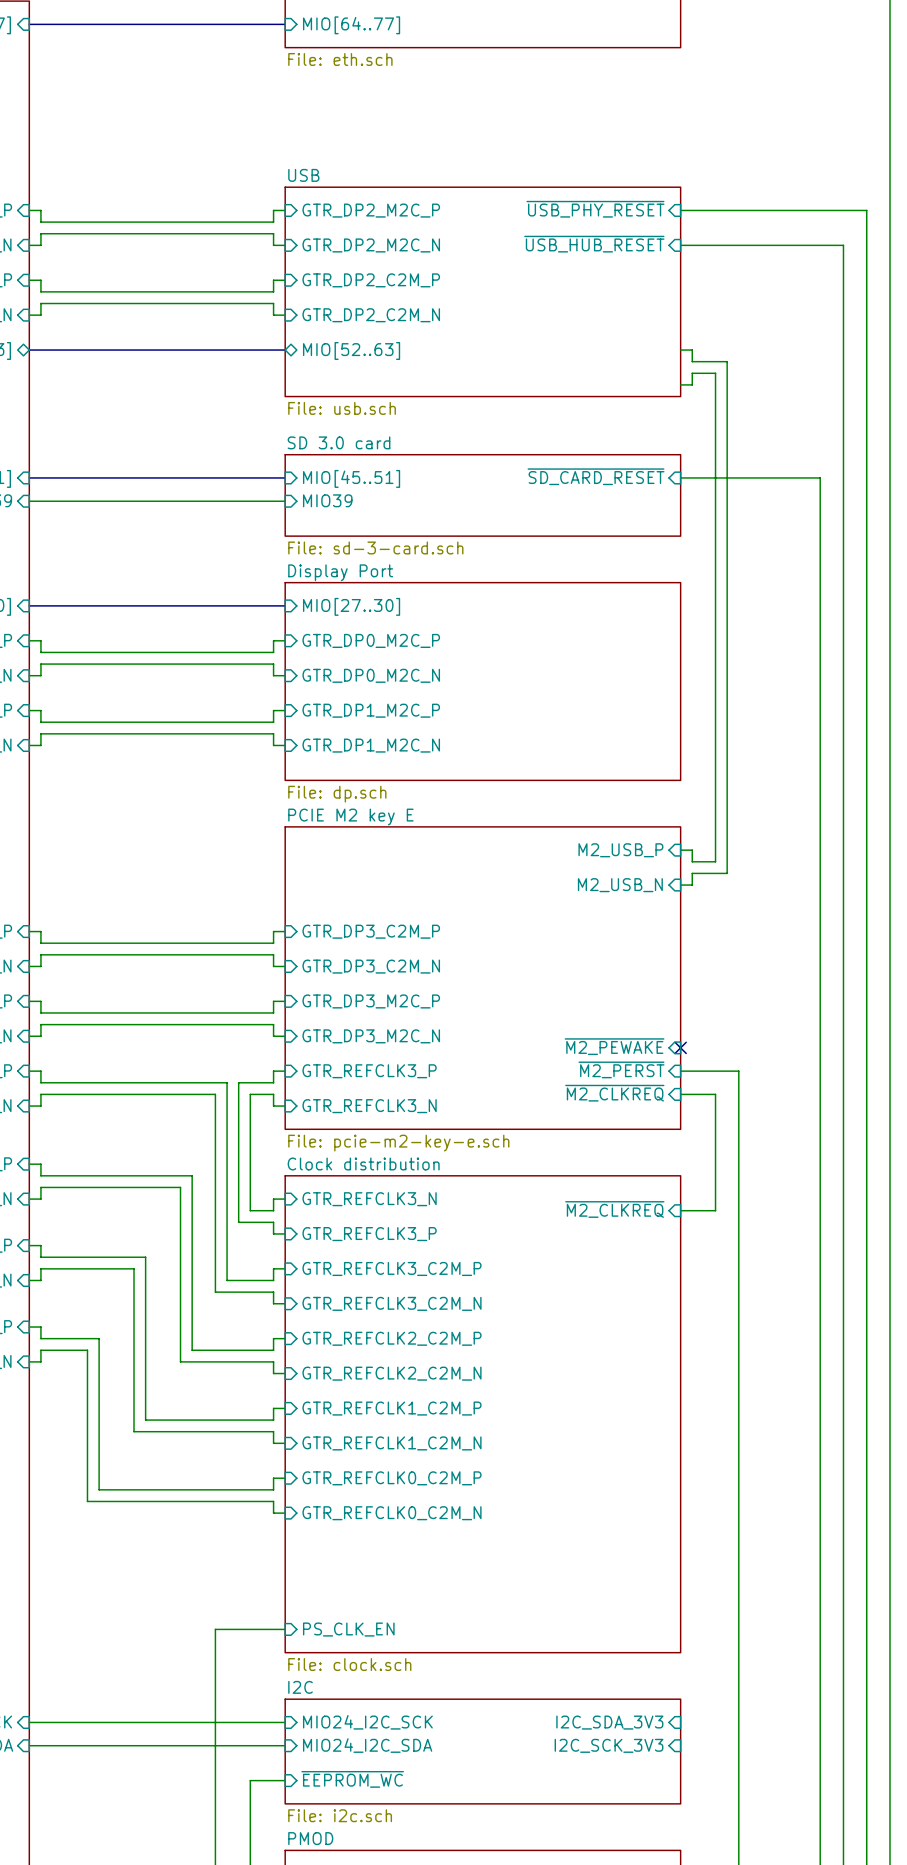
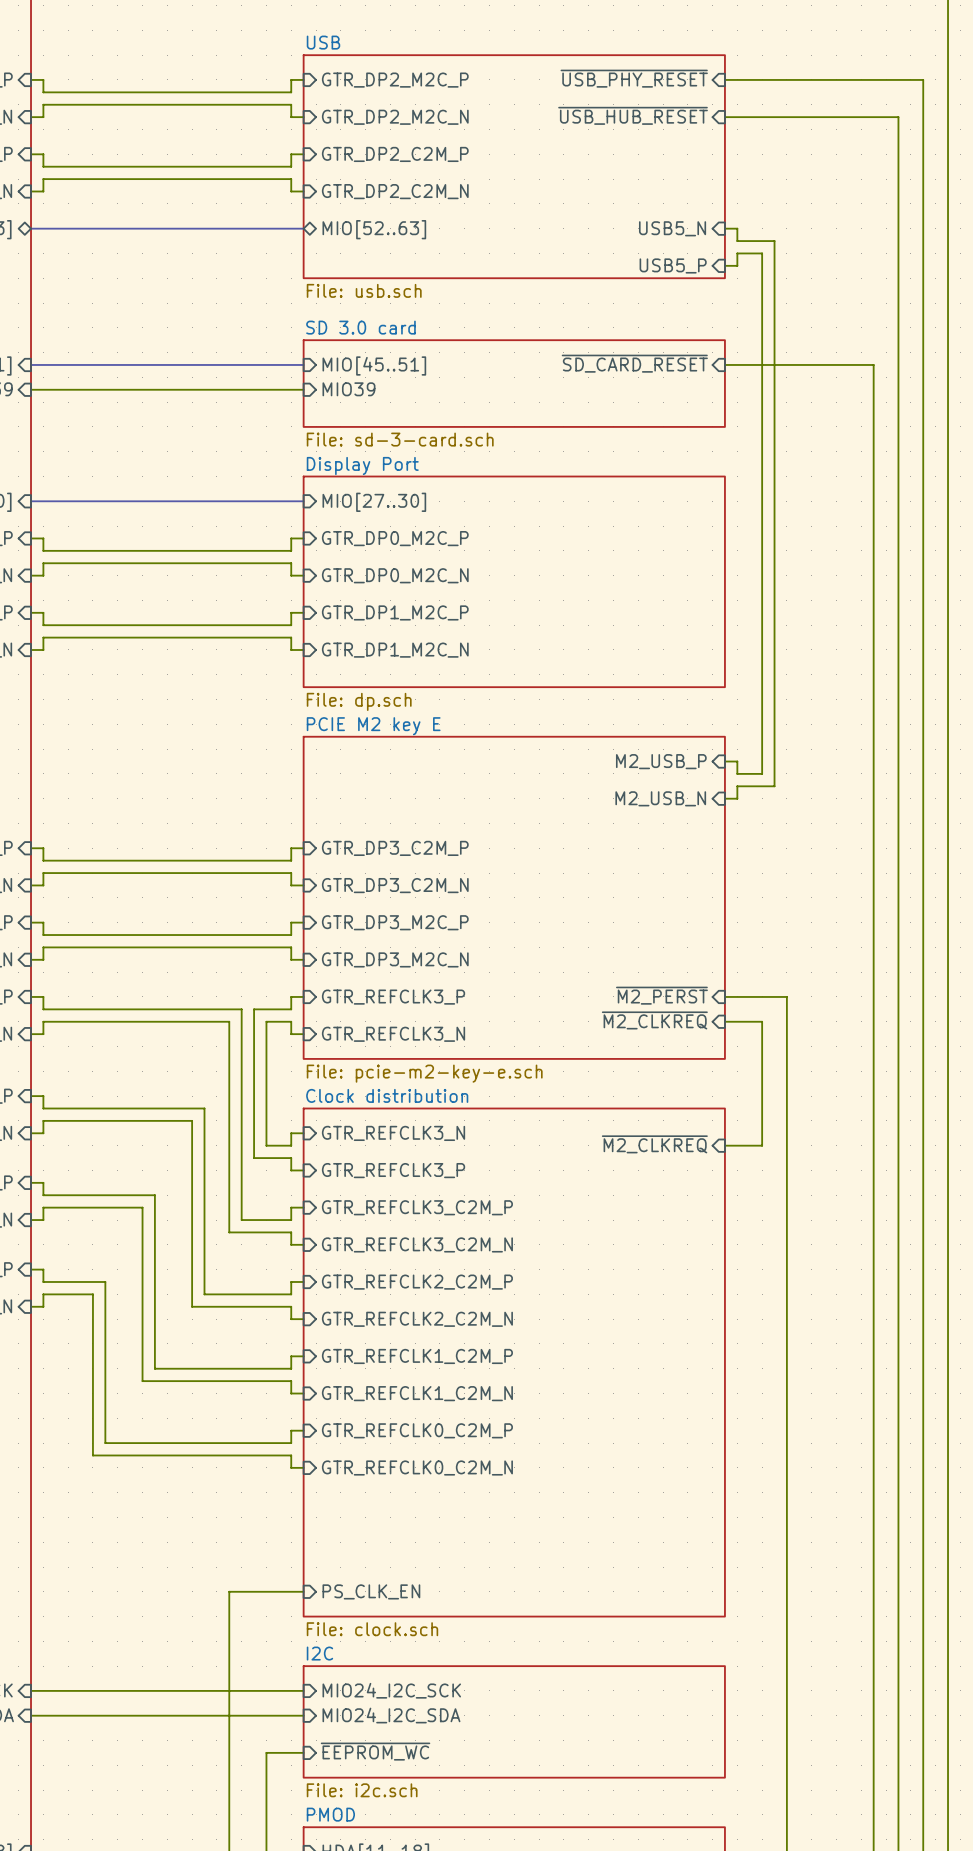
sheet pin: none -> USB5_N (672, 228)
sheet pin: none -> USB5_P (673, 265)
sheet pin: ~{M2_PEWAKE} (614, 1046) -> none
no-connect mark: (680, 1047) -> none
sheet pin: I2C_SDA_3V3 (609, 1722) -> none
sheet pin: I2C_SCK_3V3 (609, 1745) -> none

